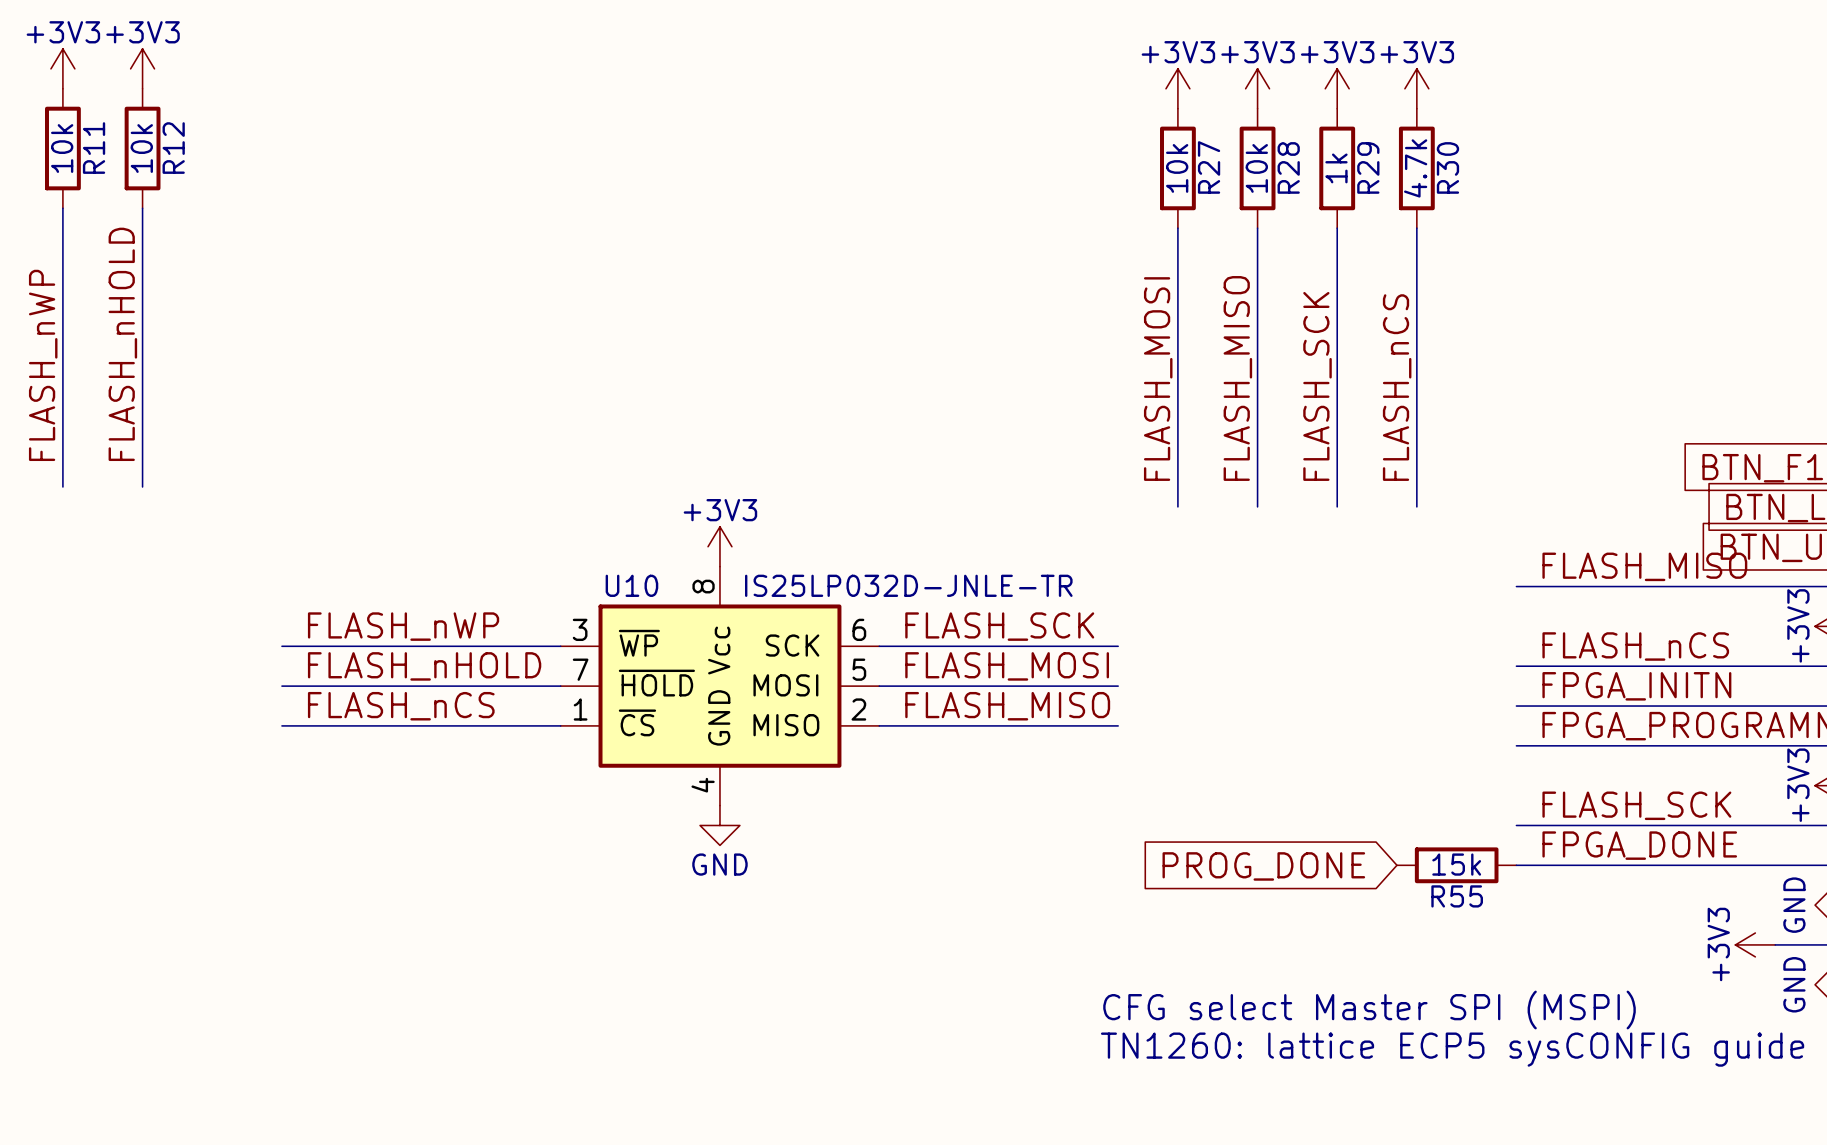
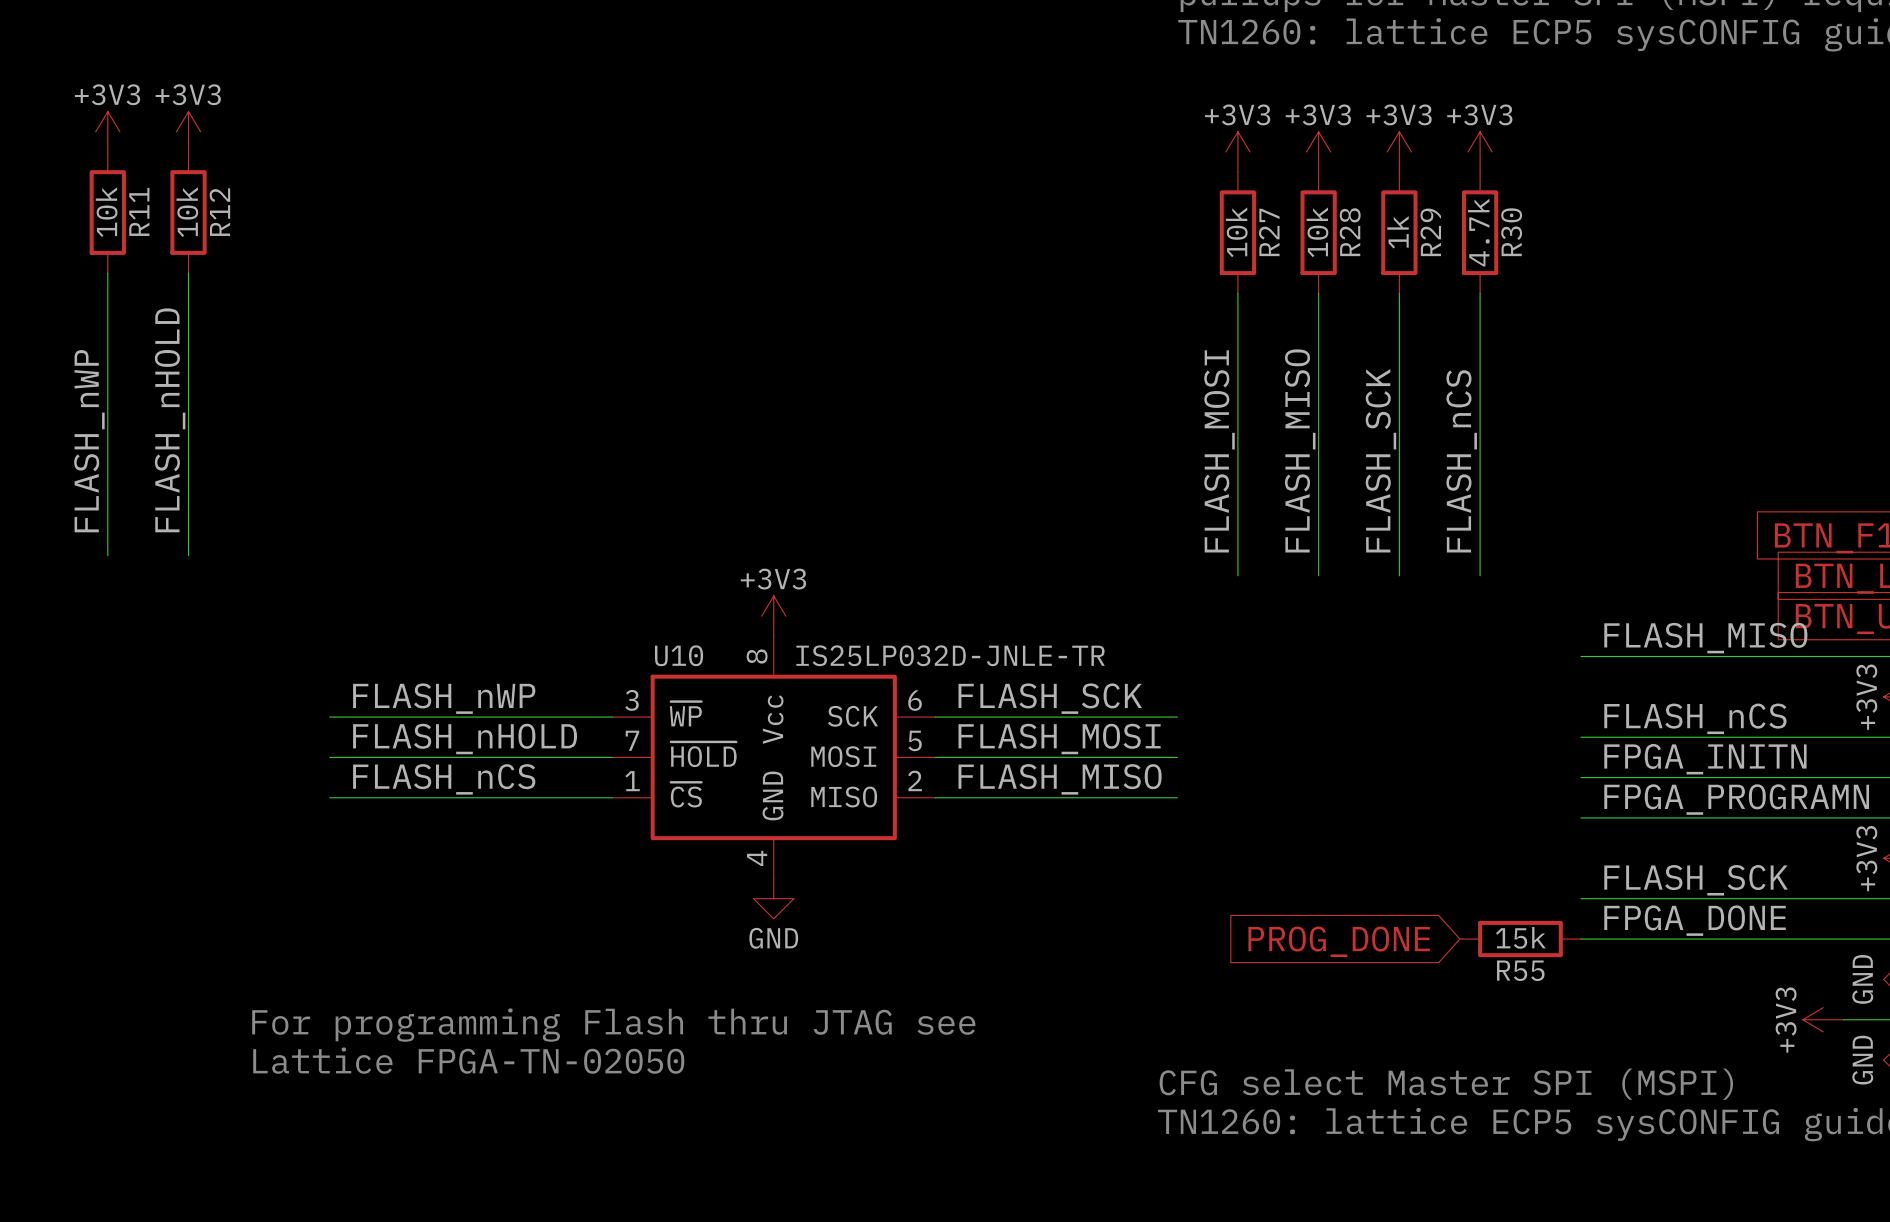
text: none -> For programming Flash thru JTAG see (613, 1025)
text: none -> Lattice FPGA-TN-02050 (468, 1060)

